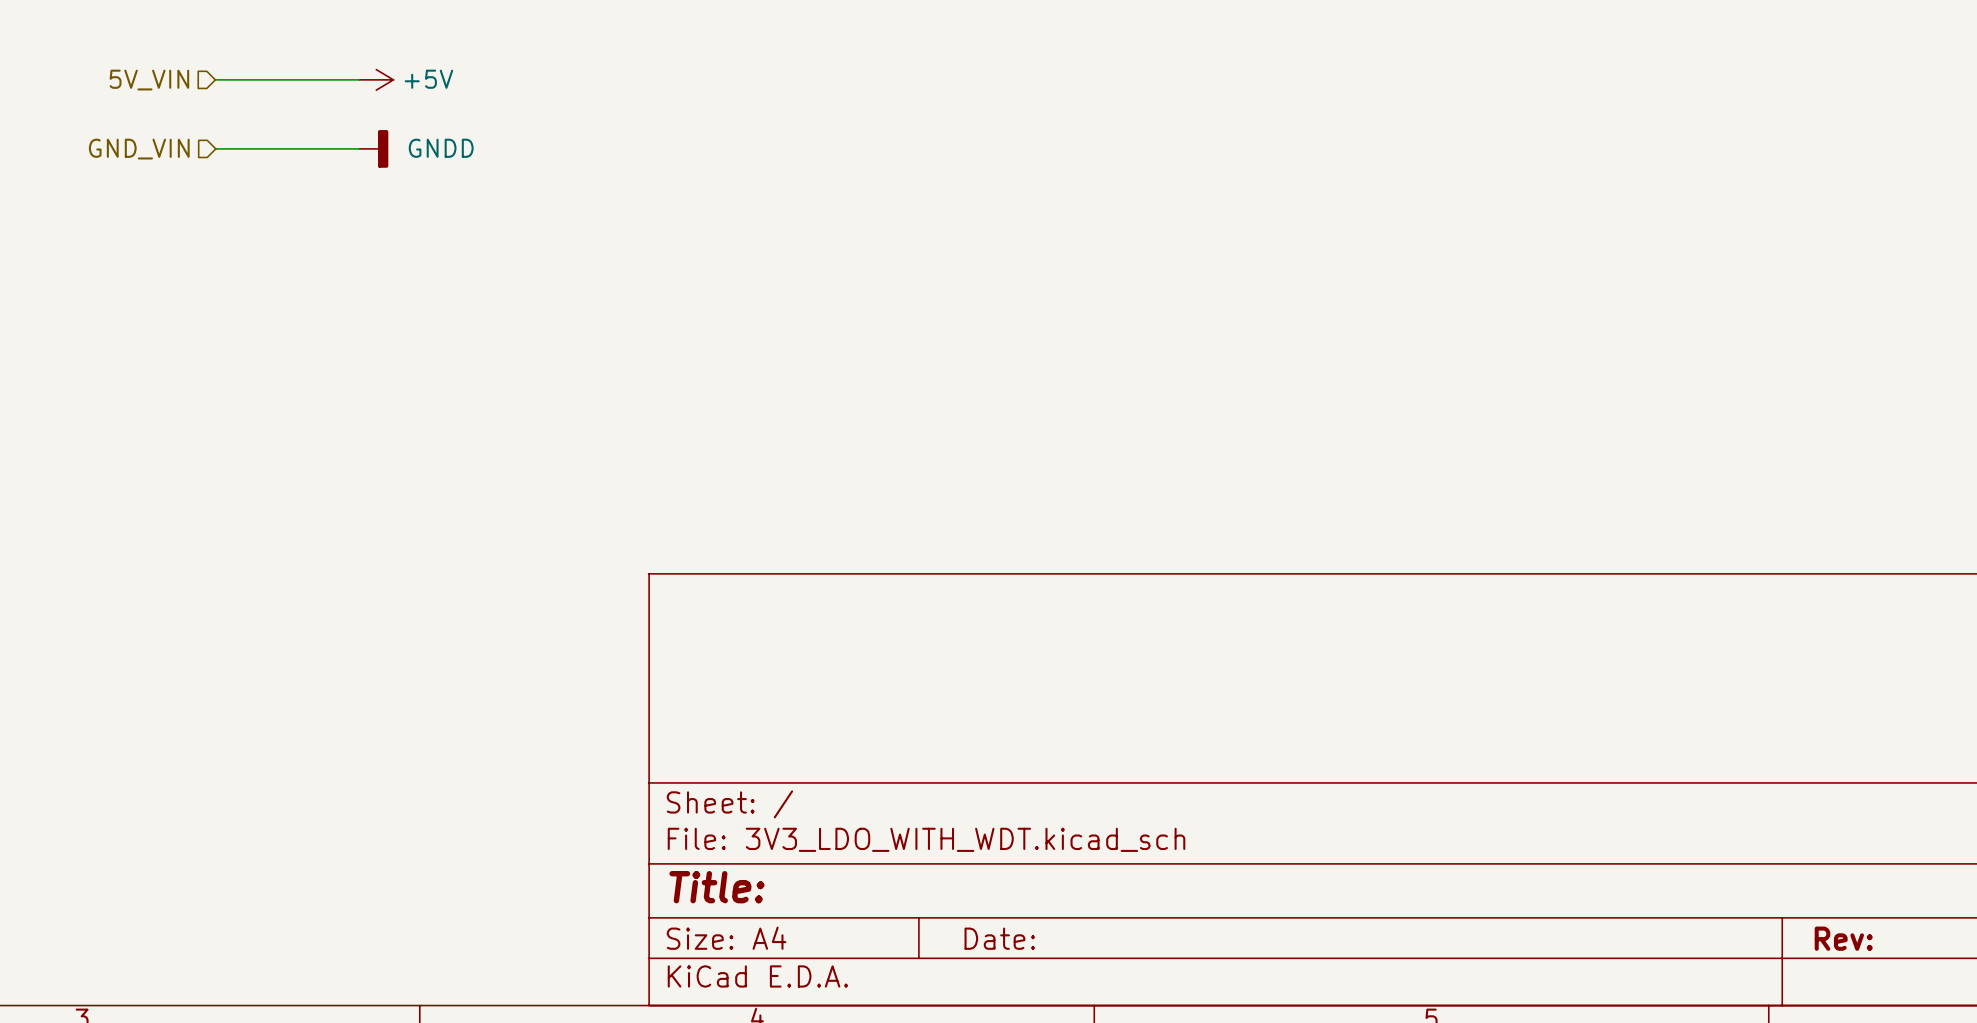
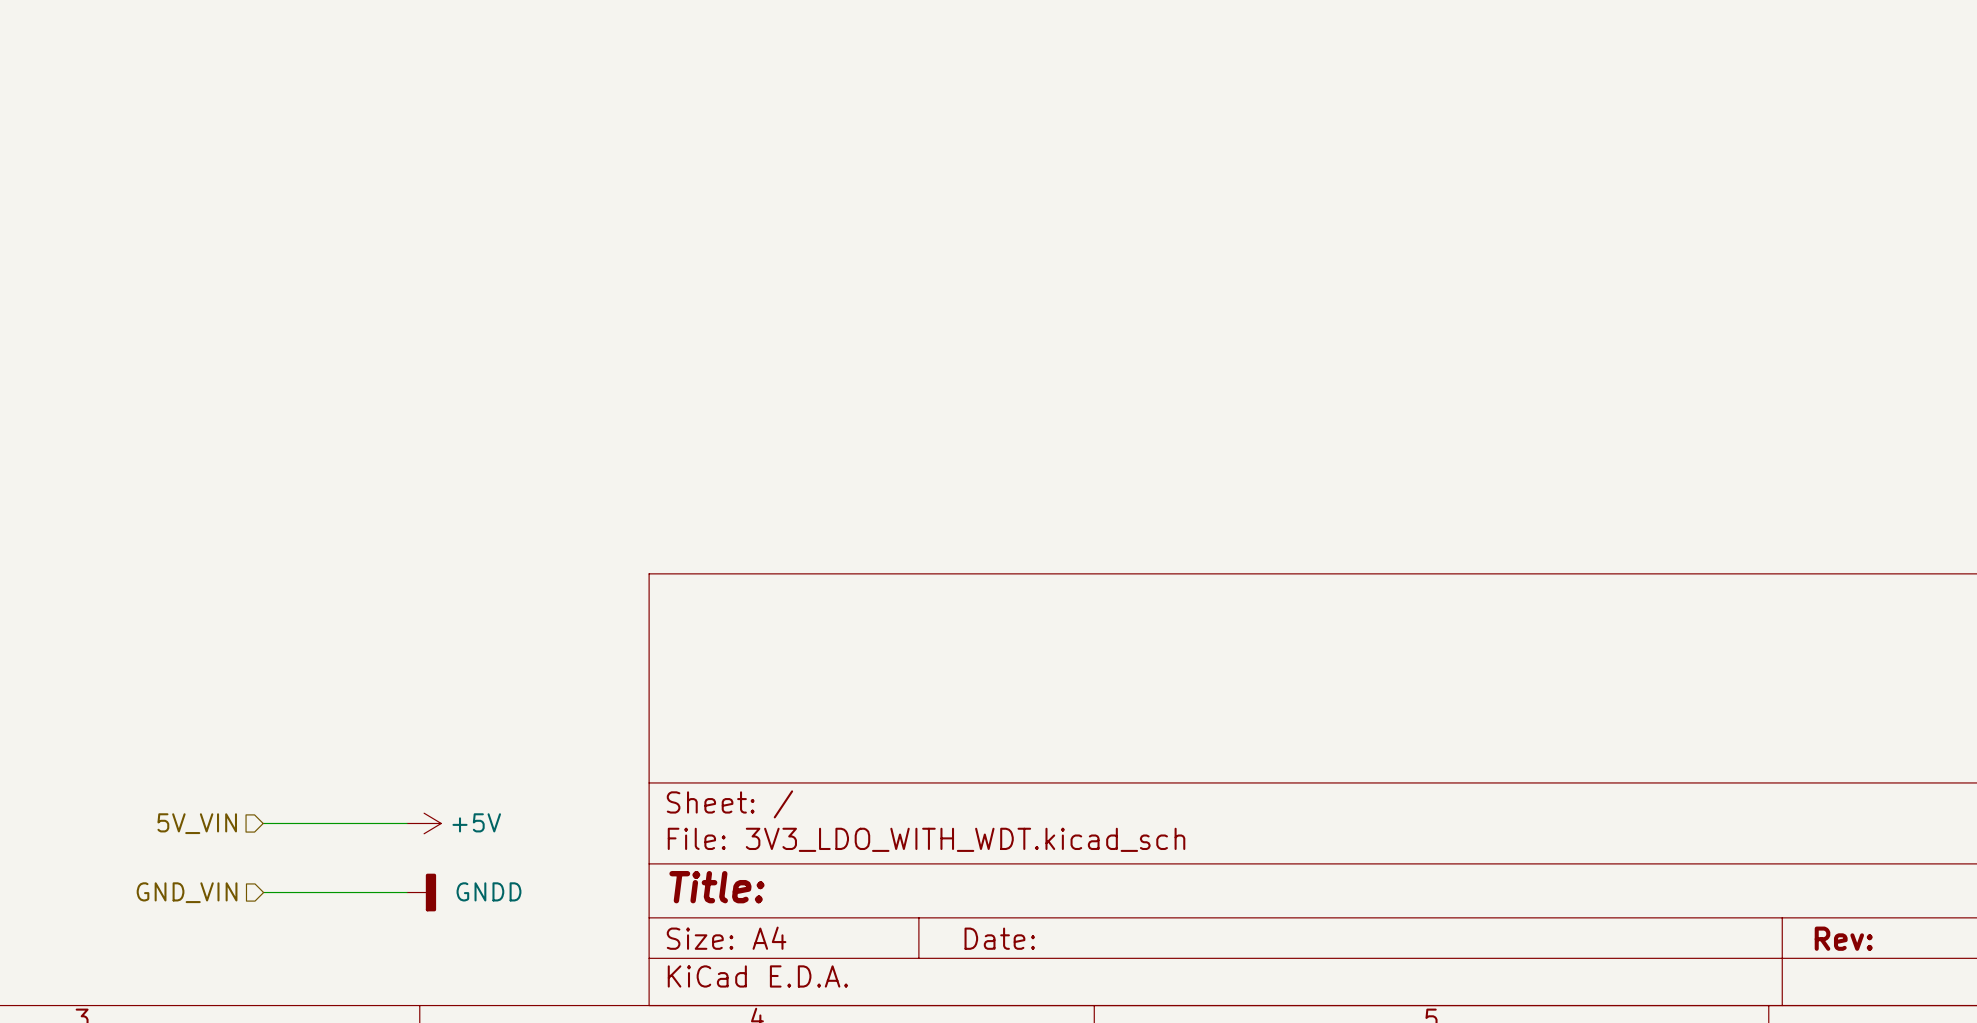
wire: (215, 79) (359, 79) -> none
power symbol: +5V (376, 79) -> none
hierarchical label: 5V_VIN (149, 80) -> none
wire: (215, 148) (359, 148) -> none
power symbol: GNDD (373, 148) -> none
hierarchical label: GND_VIN (139, 149) -> none
hierarchical label: none -> 5V_VIN (197, 823)
wire: none -> (263, 823) (406, 823)
power symbol: none -> +5V (424, 823)
hierarchical label: none -> GND_VIN (187, 892)
wire: none -> (263, 892) (406, 892)
power symbol: none -> GNDD (421, 892)

